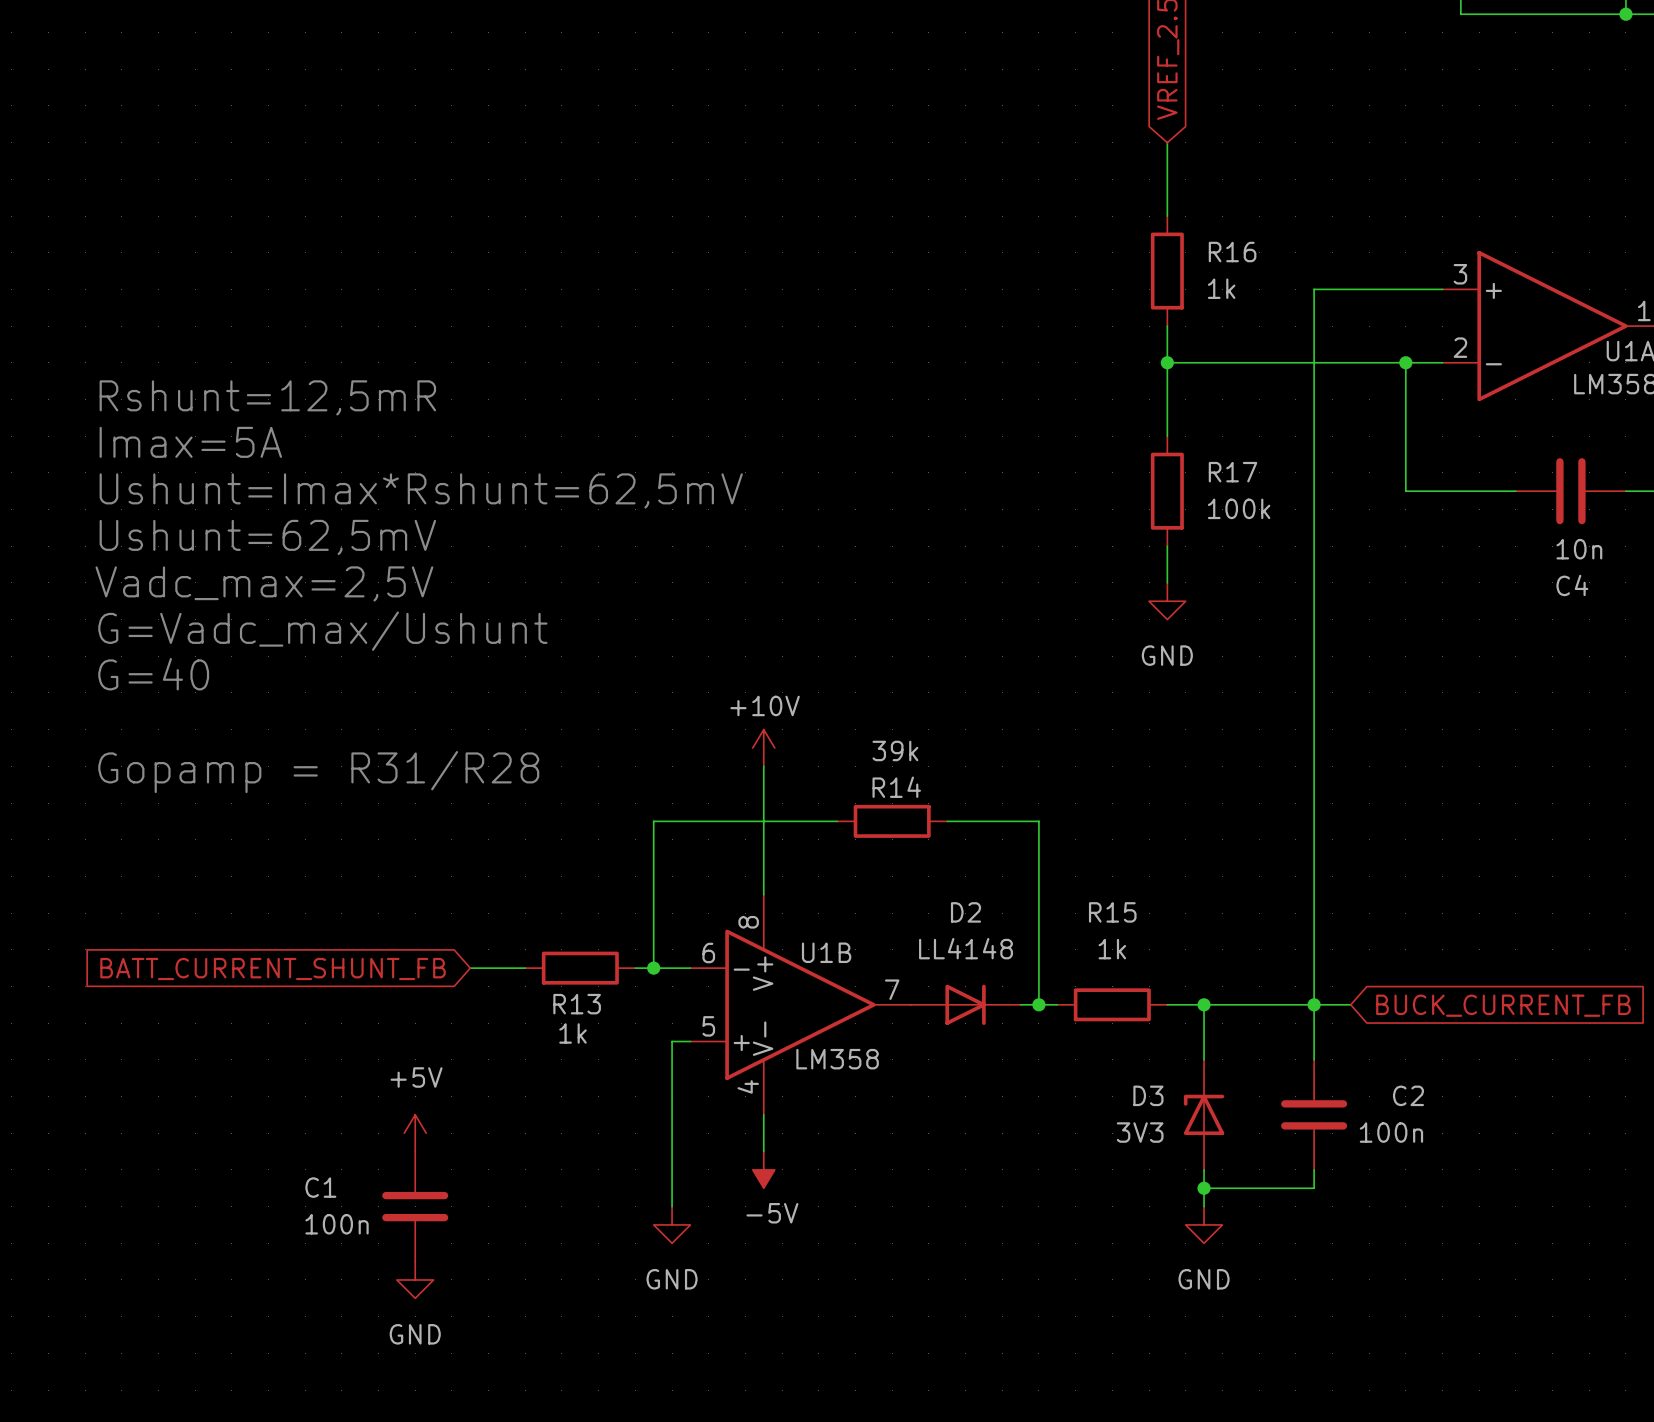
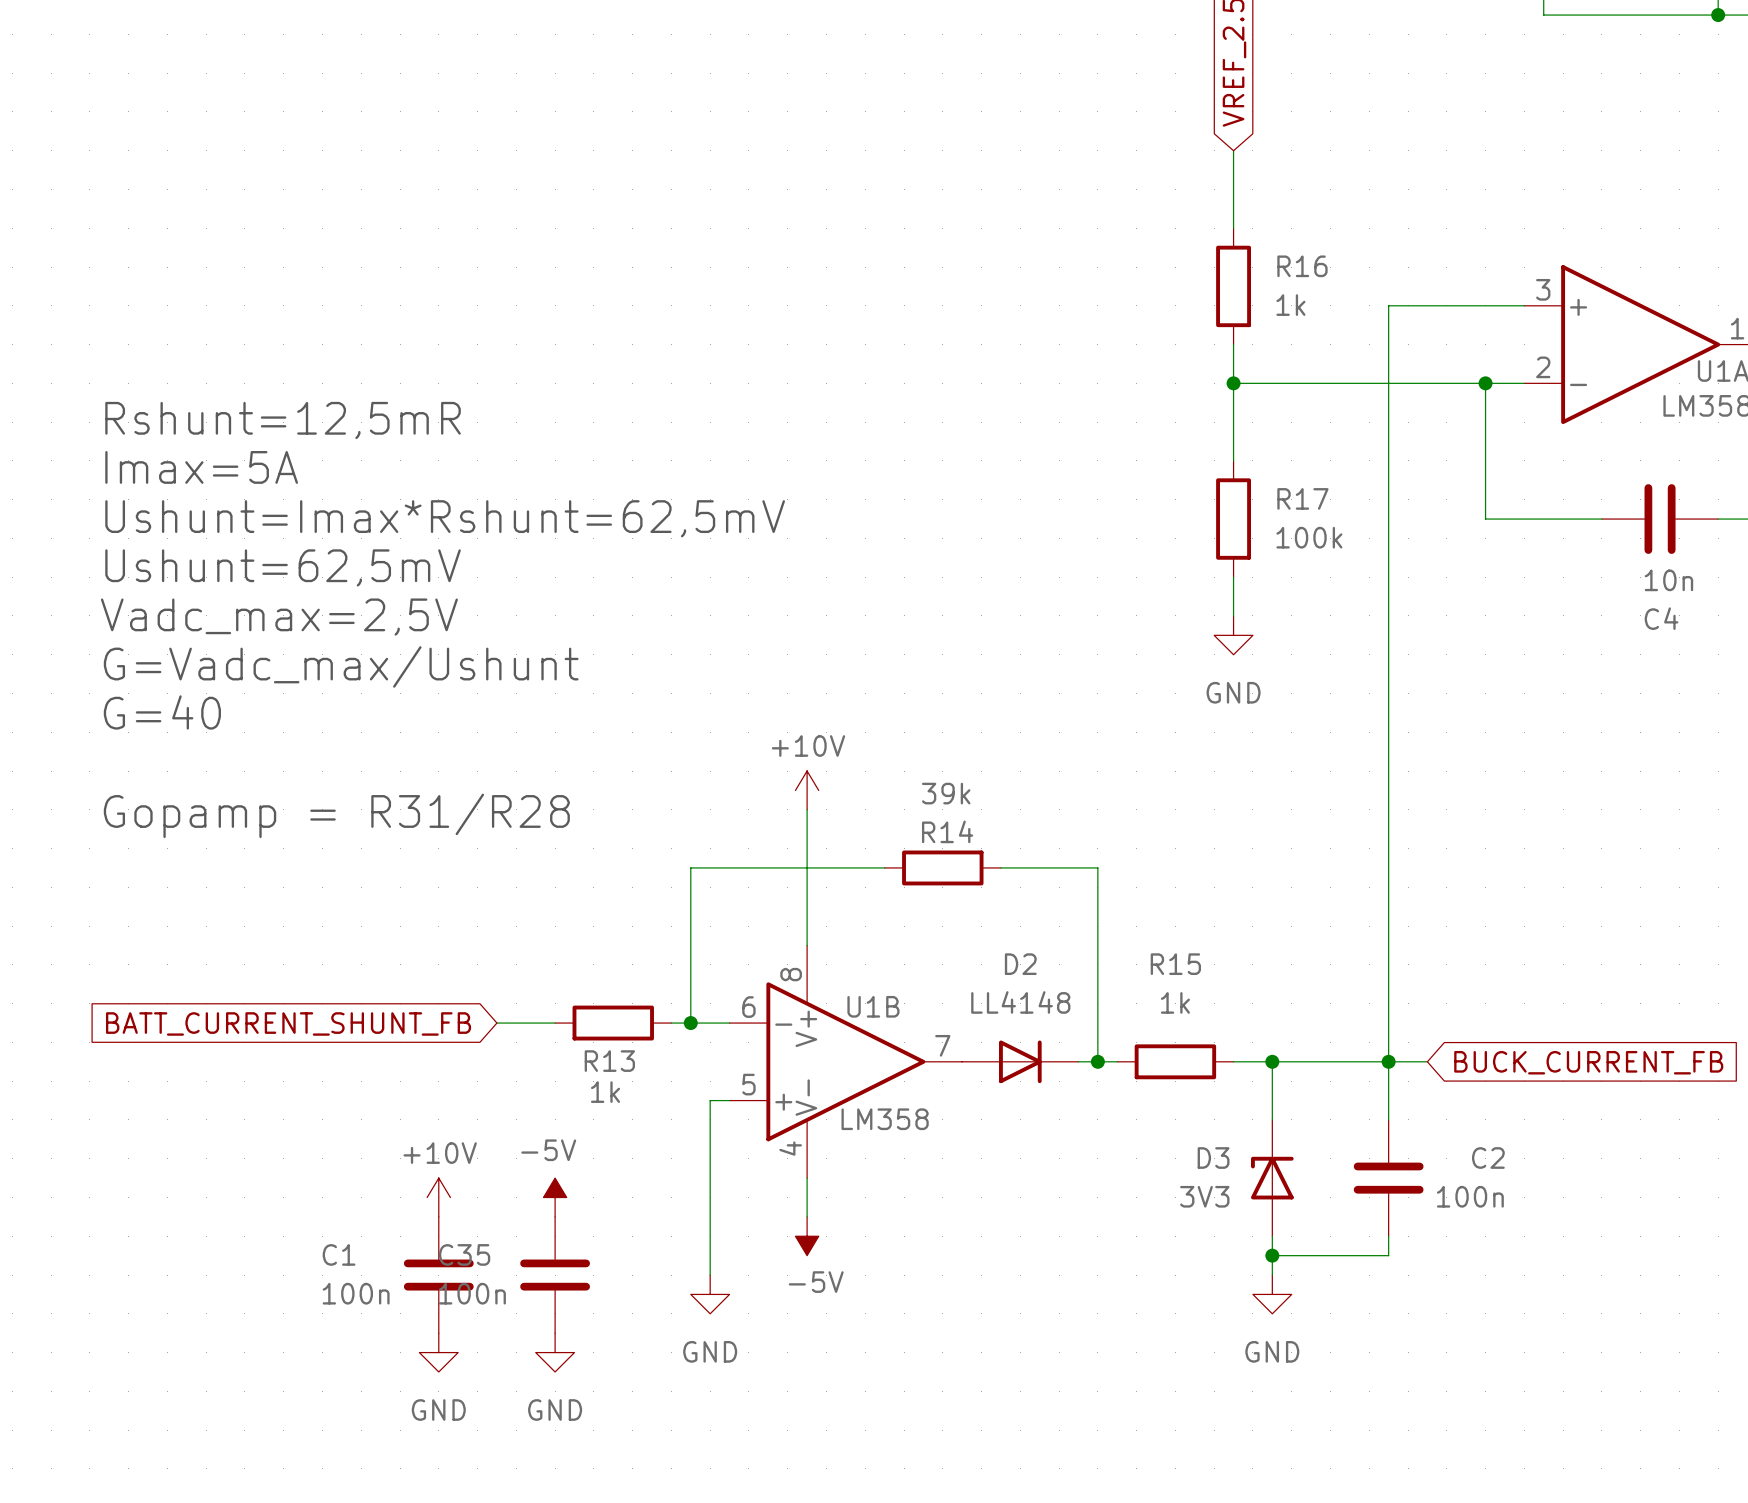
power symbol: +5V (415, 1133) -> +10V (438, 1197)
power symbol: none -> -5V (555, 1197)
C35: none -> 100n (555, 1275)
power symbol: none -> GND (555, 1352)

